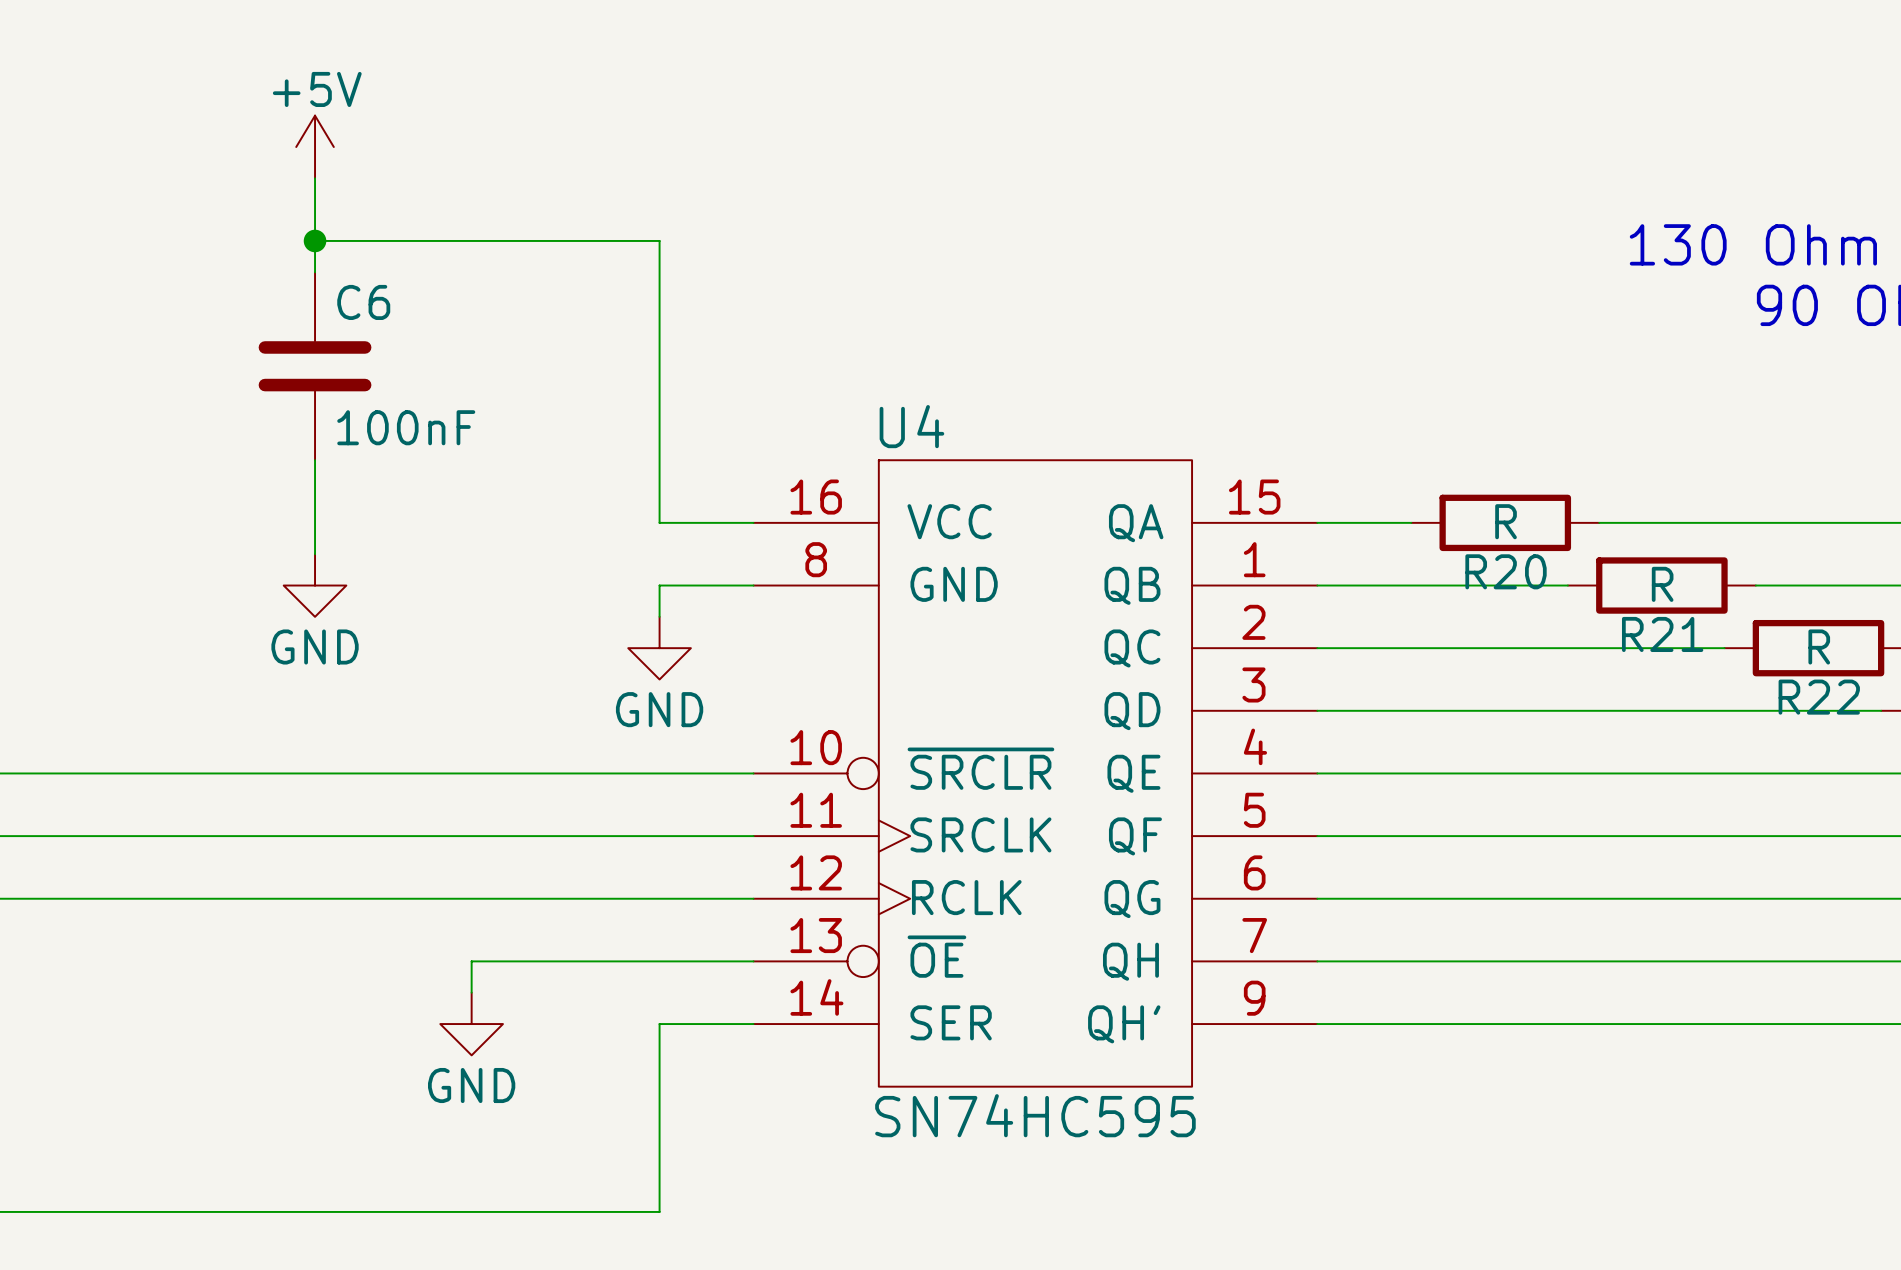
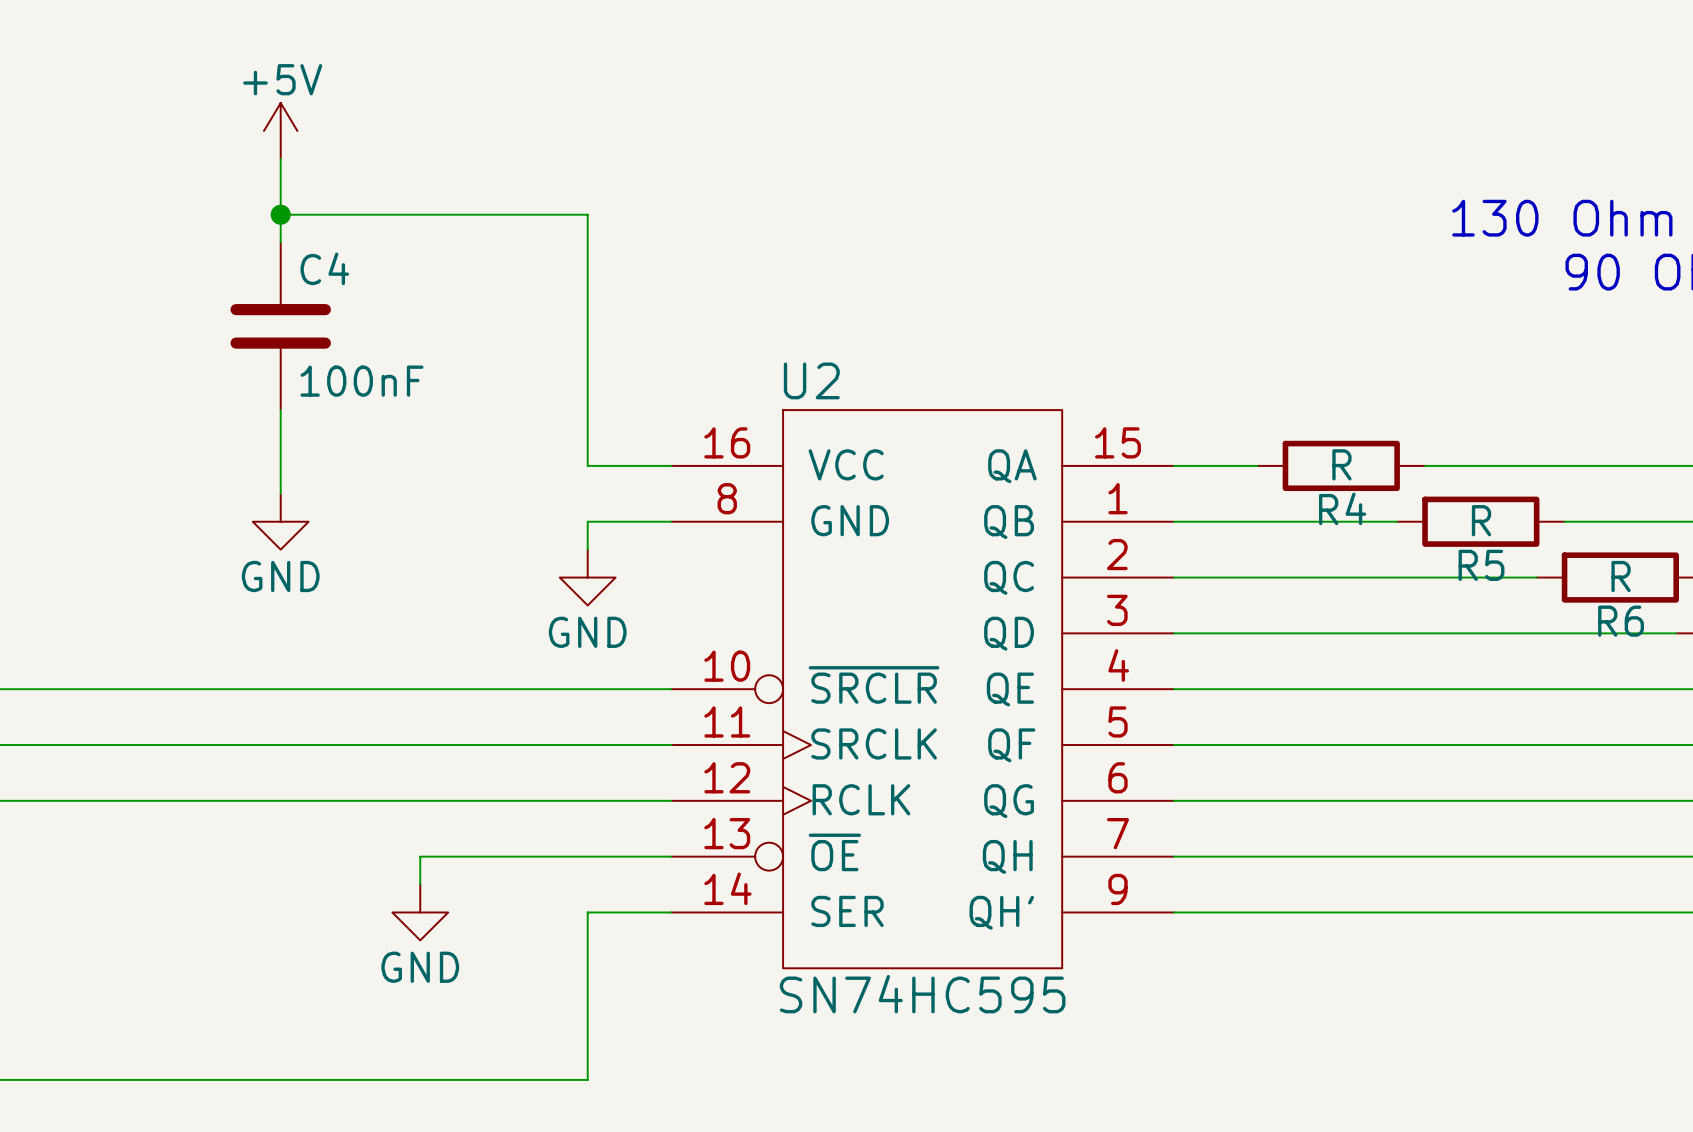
C6 name: C6 (363, 302) -> C4 (324, 268)
U4 name: U4 (911, 426) -> U2 (811, 380)
R20 name: R20 (1506, 571) -> R4 (1342, 508)
R21 name: R21 (1662, 634) -> R5 (1481, 565)
R22 name: R22 (1819, 697) -> R6 (1621, 621)

